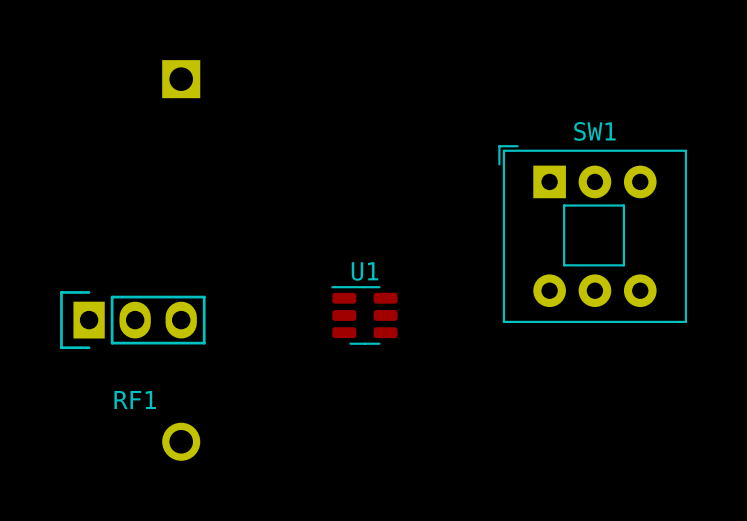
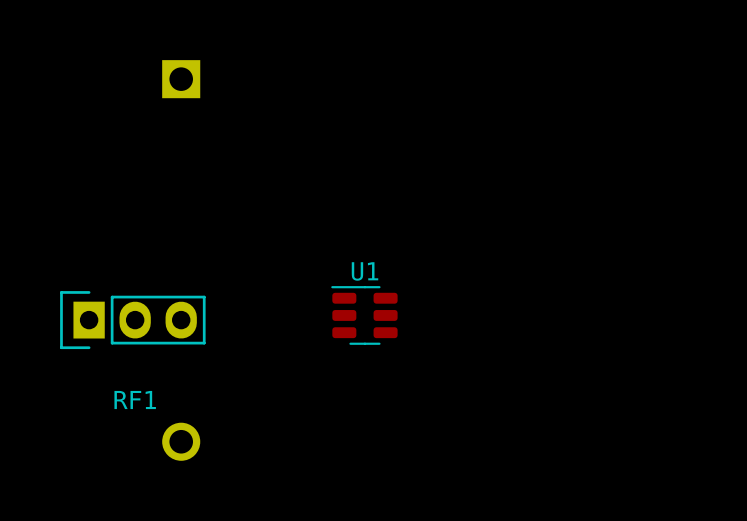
SW1: (592, 234) -> none

